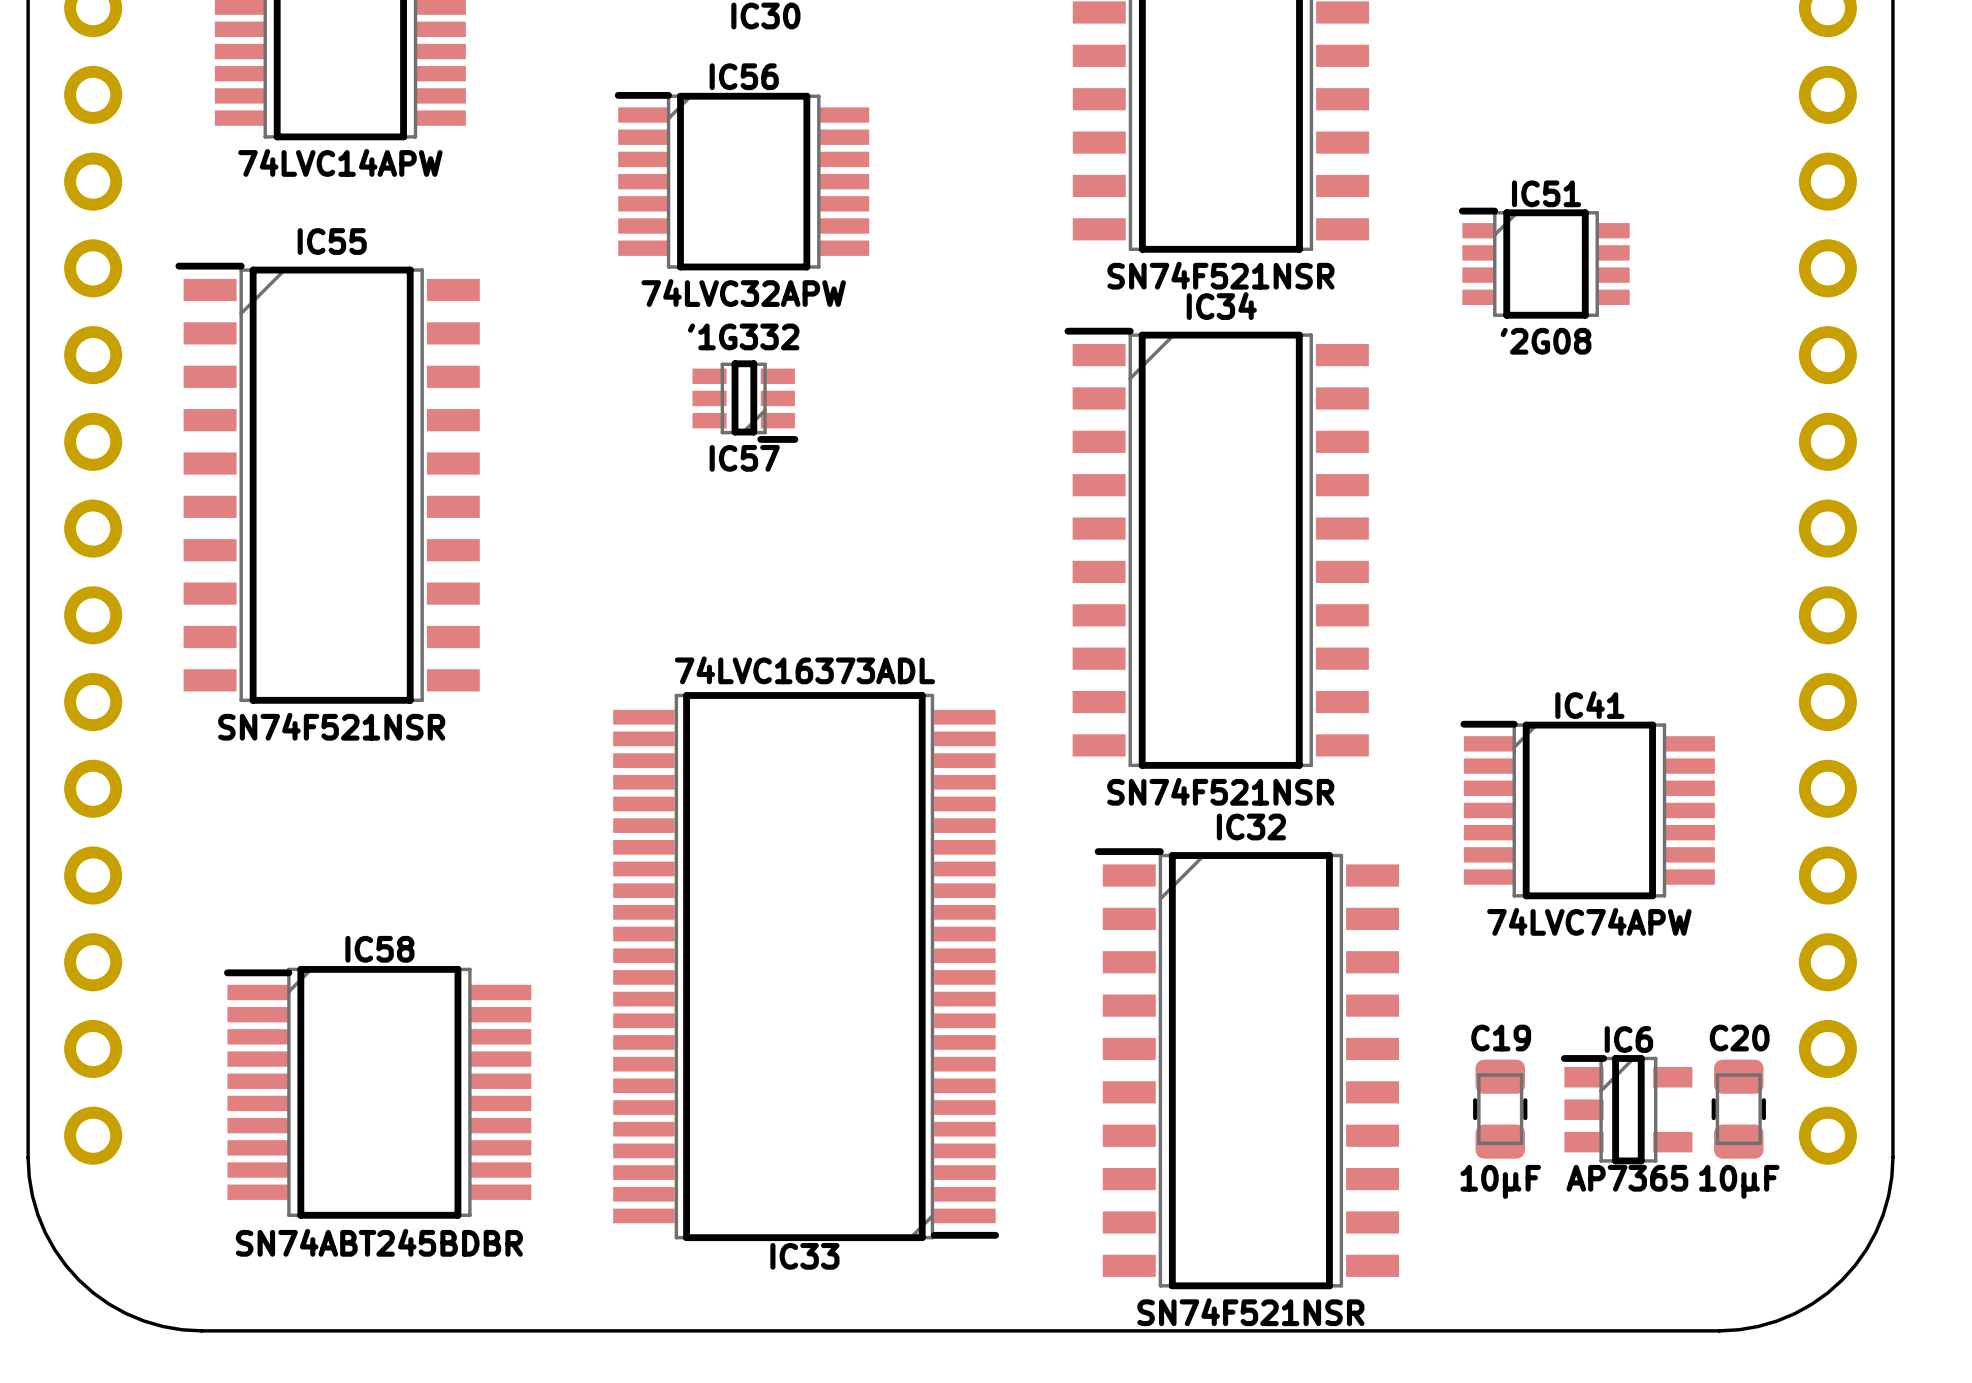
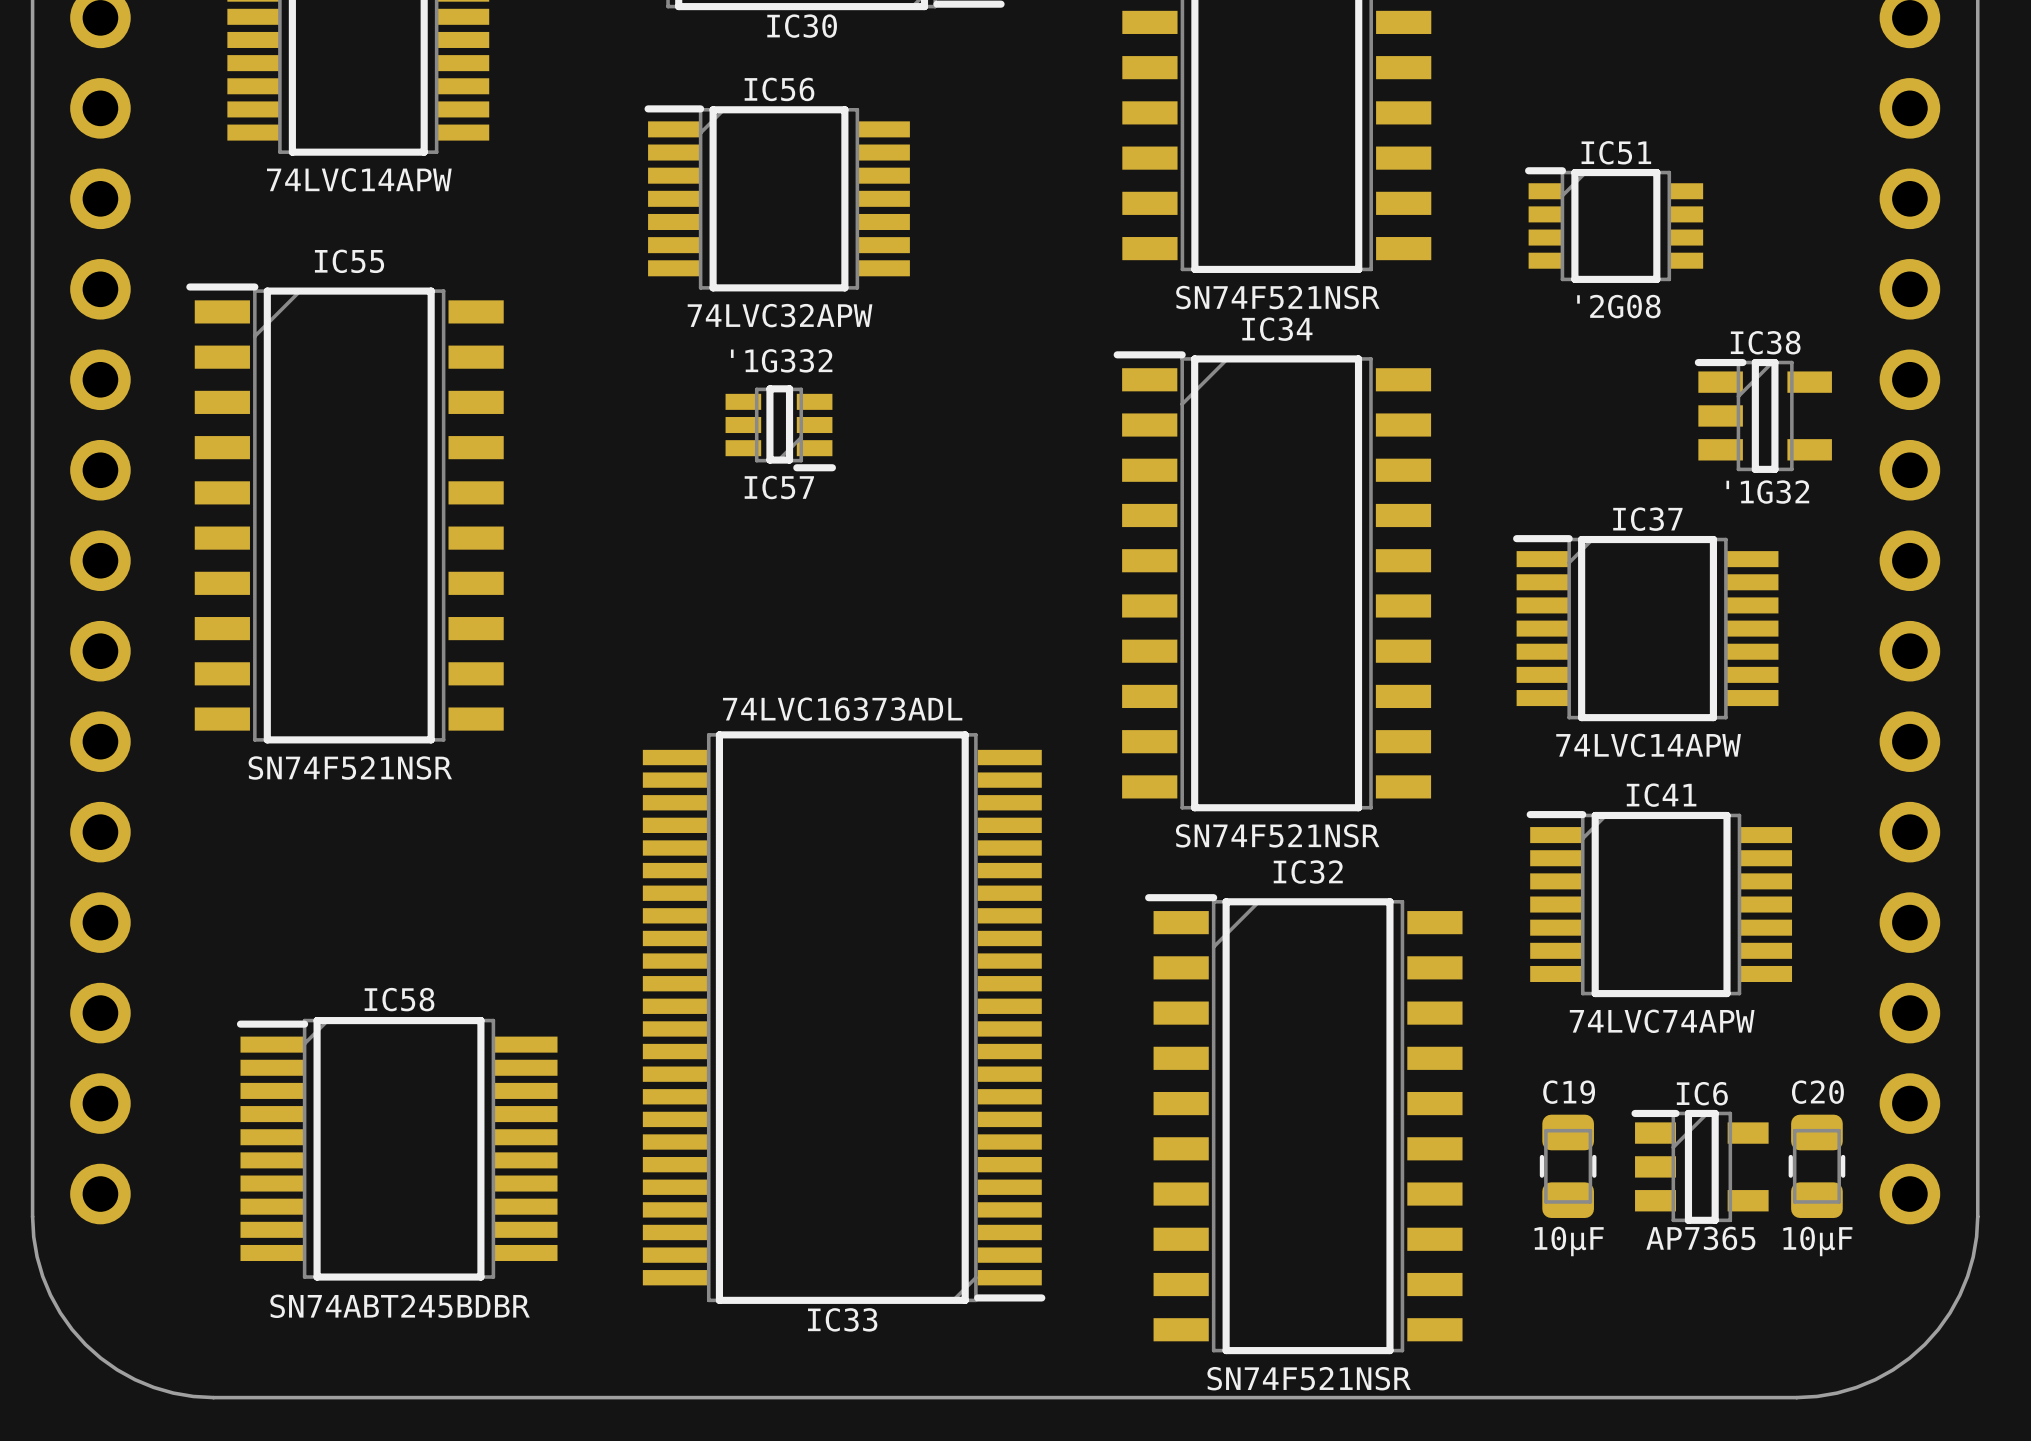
IC51 position: (1544, 263) -> (1614, 225)
IC38: none -> (1763, 415)
IC37: none -> (1645, 628)
IC41 position: (1587, 810) -> (1659, 904)

